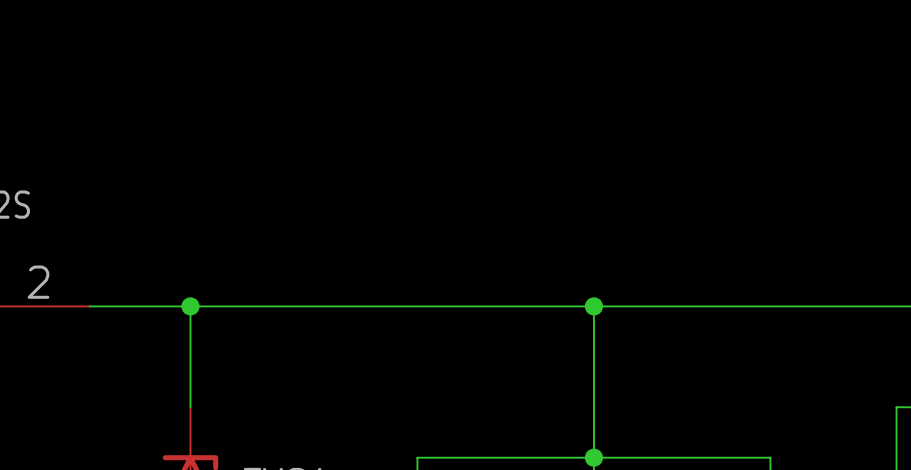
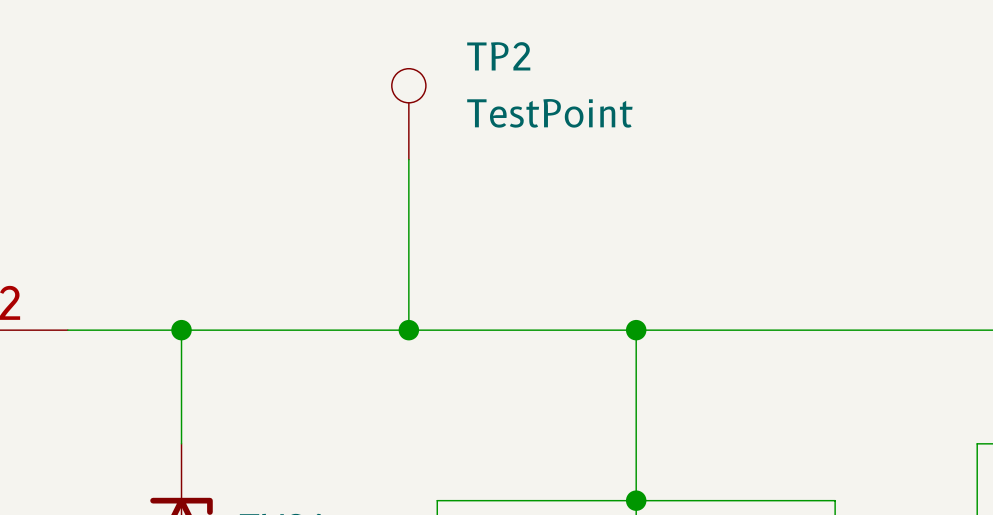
TP2: none -> TestPoint (408, 114)
wire: none -> (408, 159) (408, 330)
junction: none -> (408, 330)

